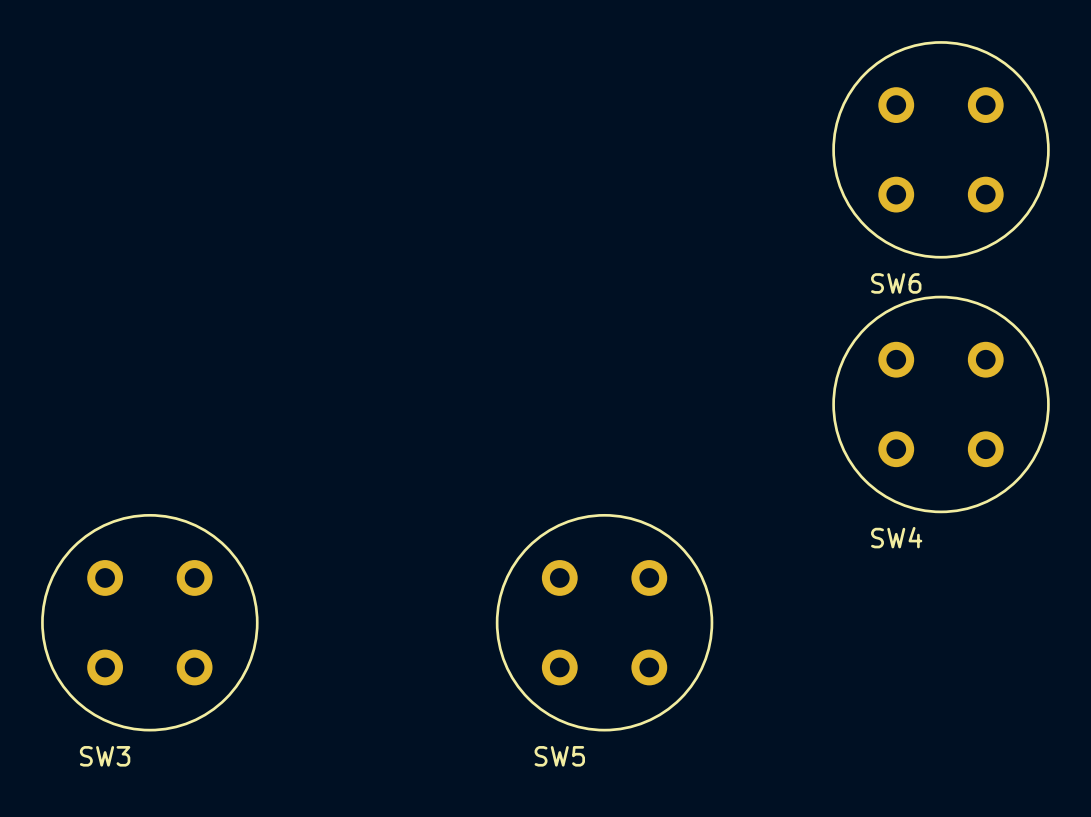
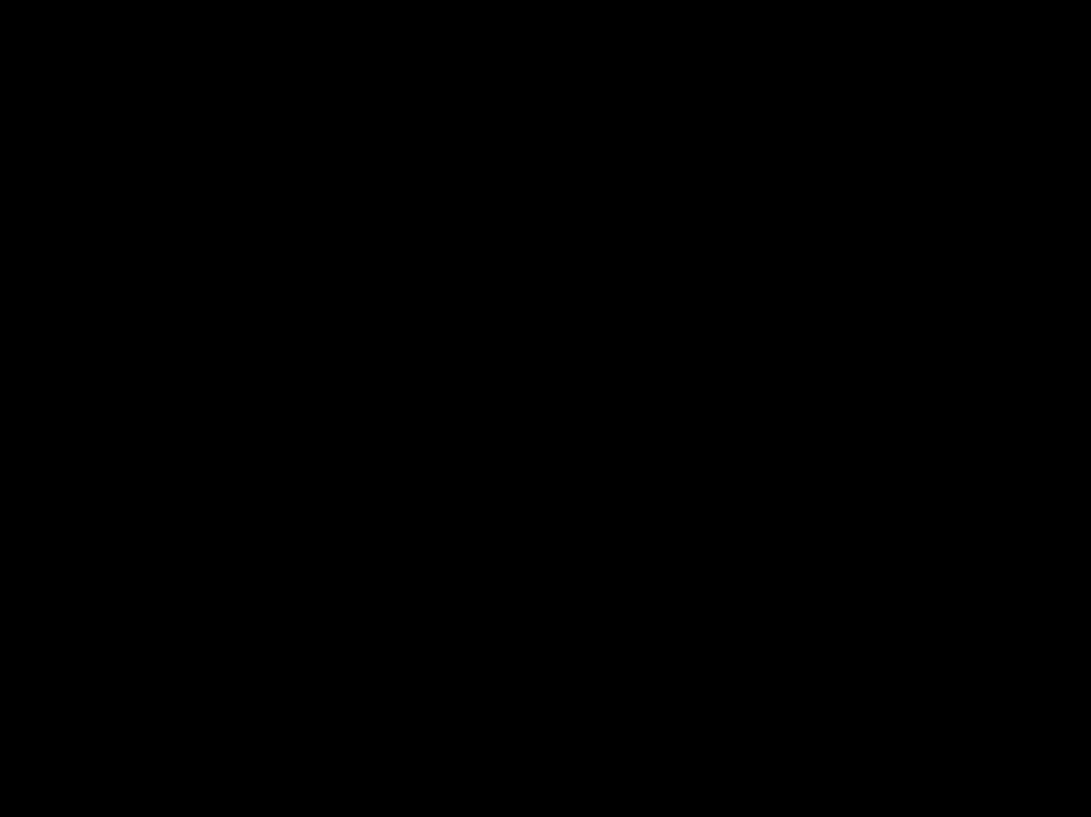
SW6: (941, 149) -> none
SW4: (941, 404) -> none
SW3: (149, 622) -> none
SW5: (604, 622) -> none

